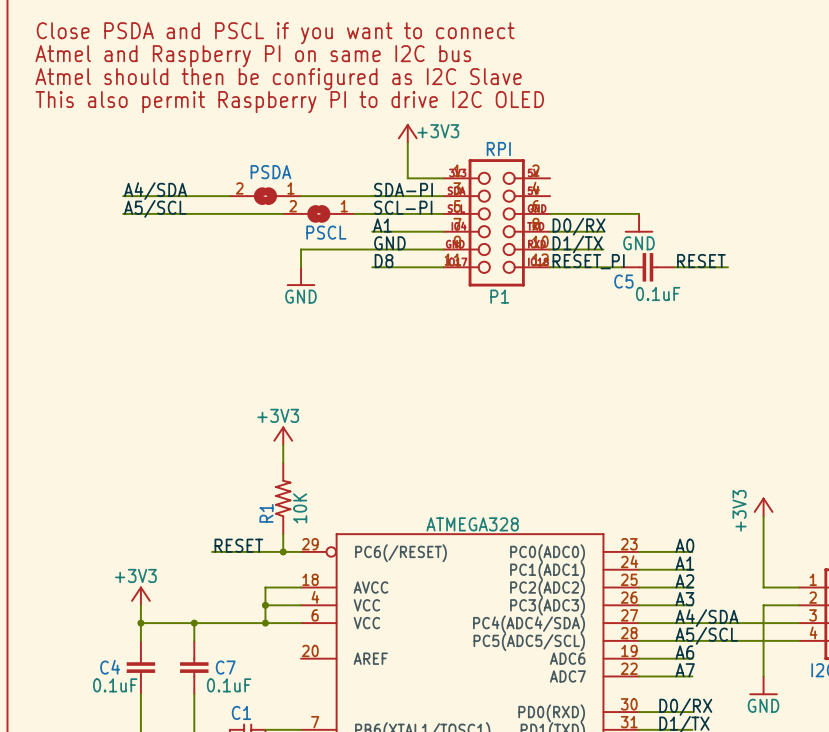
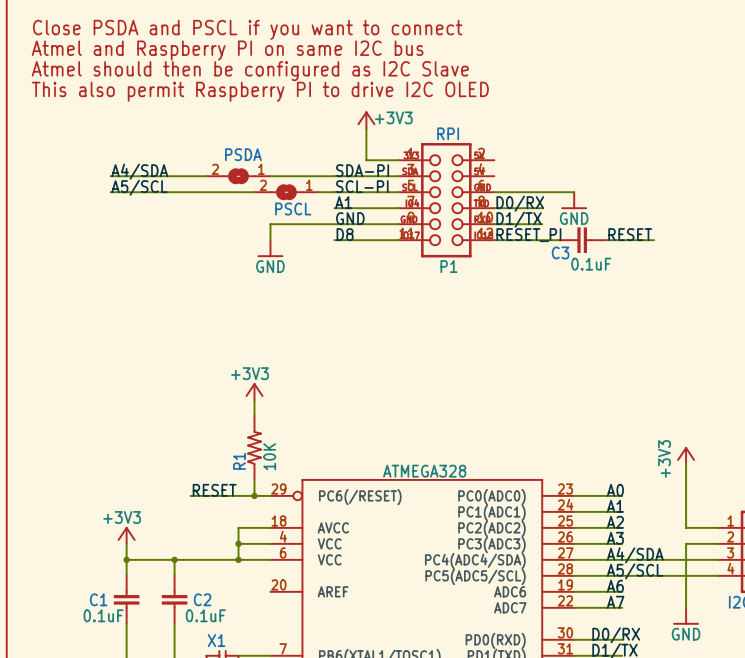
C5 name: C5 (623, 281) -> C3 (560, 252)
C4 name: C4 (110, 667) -> C1 (98, 599)
C7 name: C7 (225, 667) -> C2 (202, 599)
C1 name: C1 (241, 712) -> X1 (216, 640)

